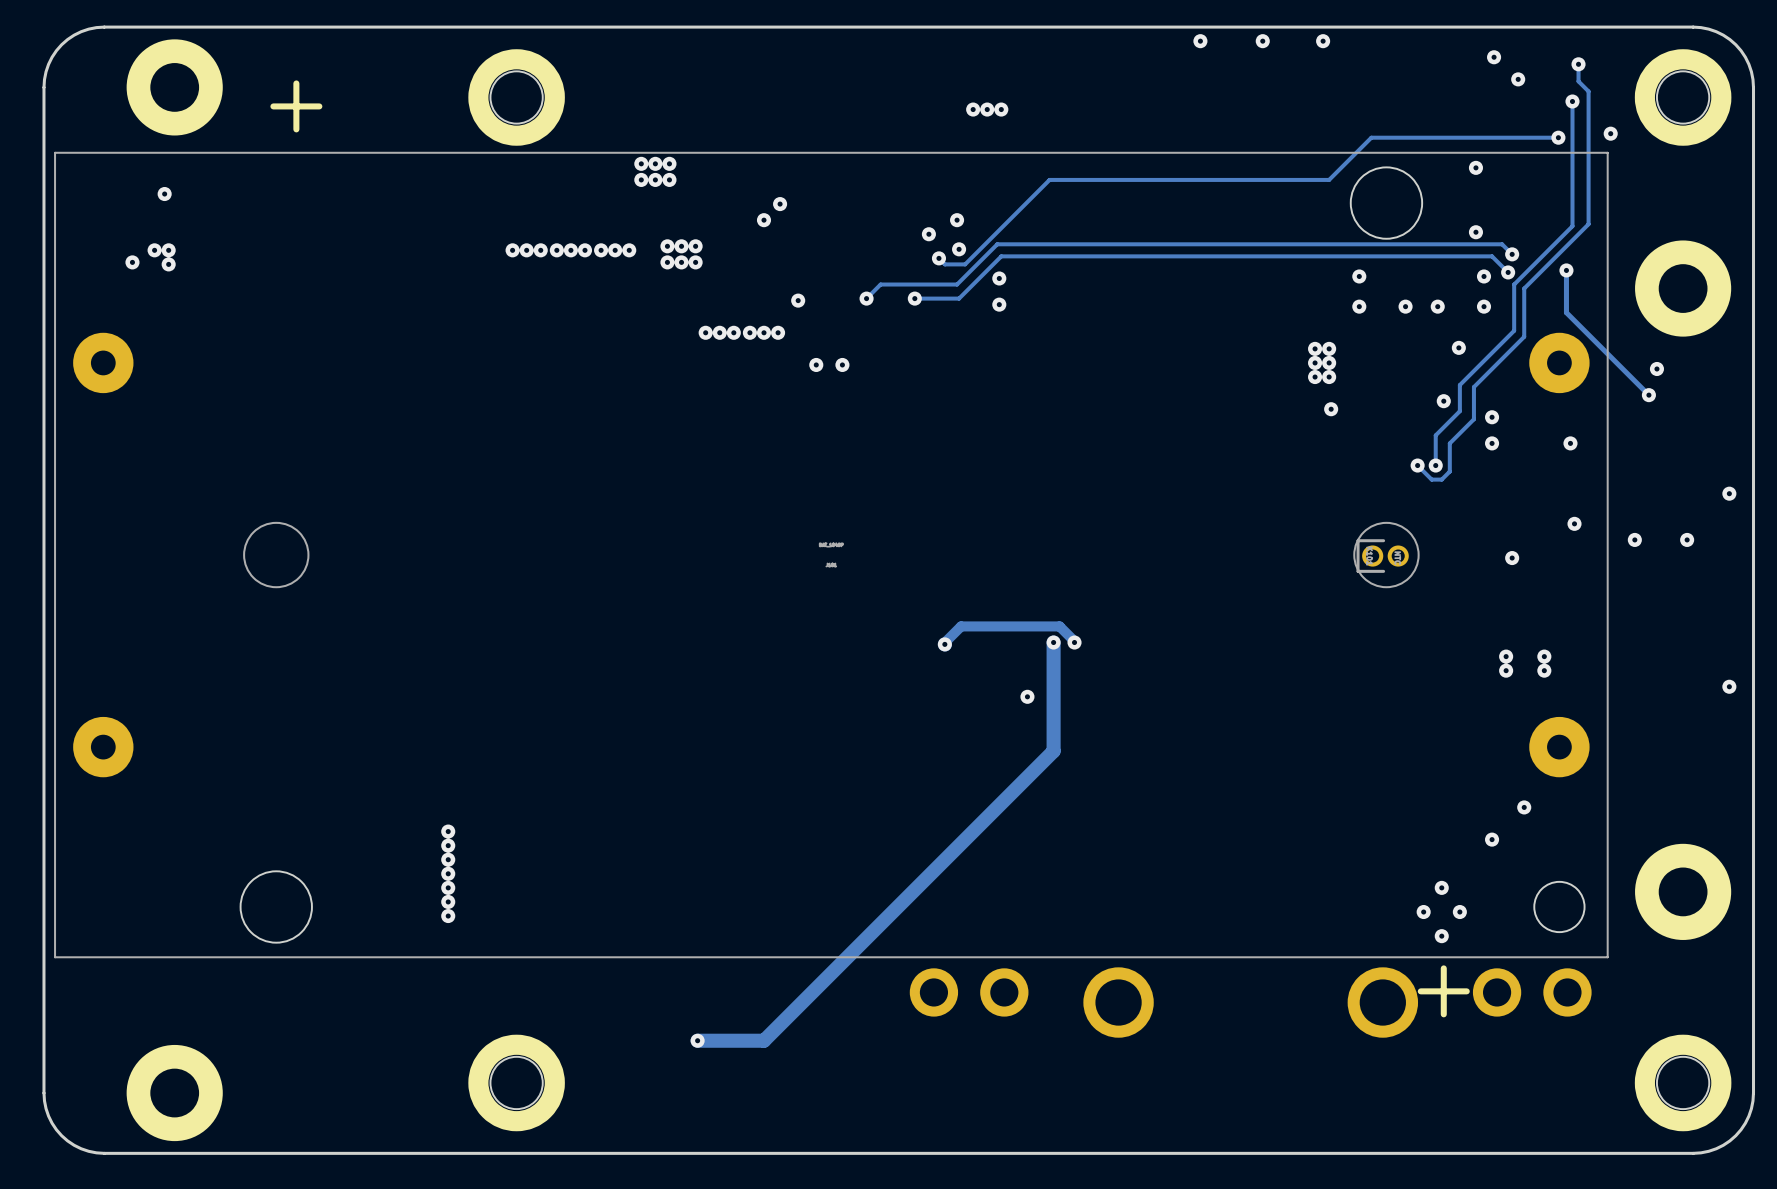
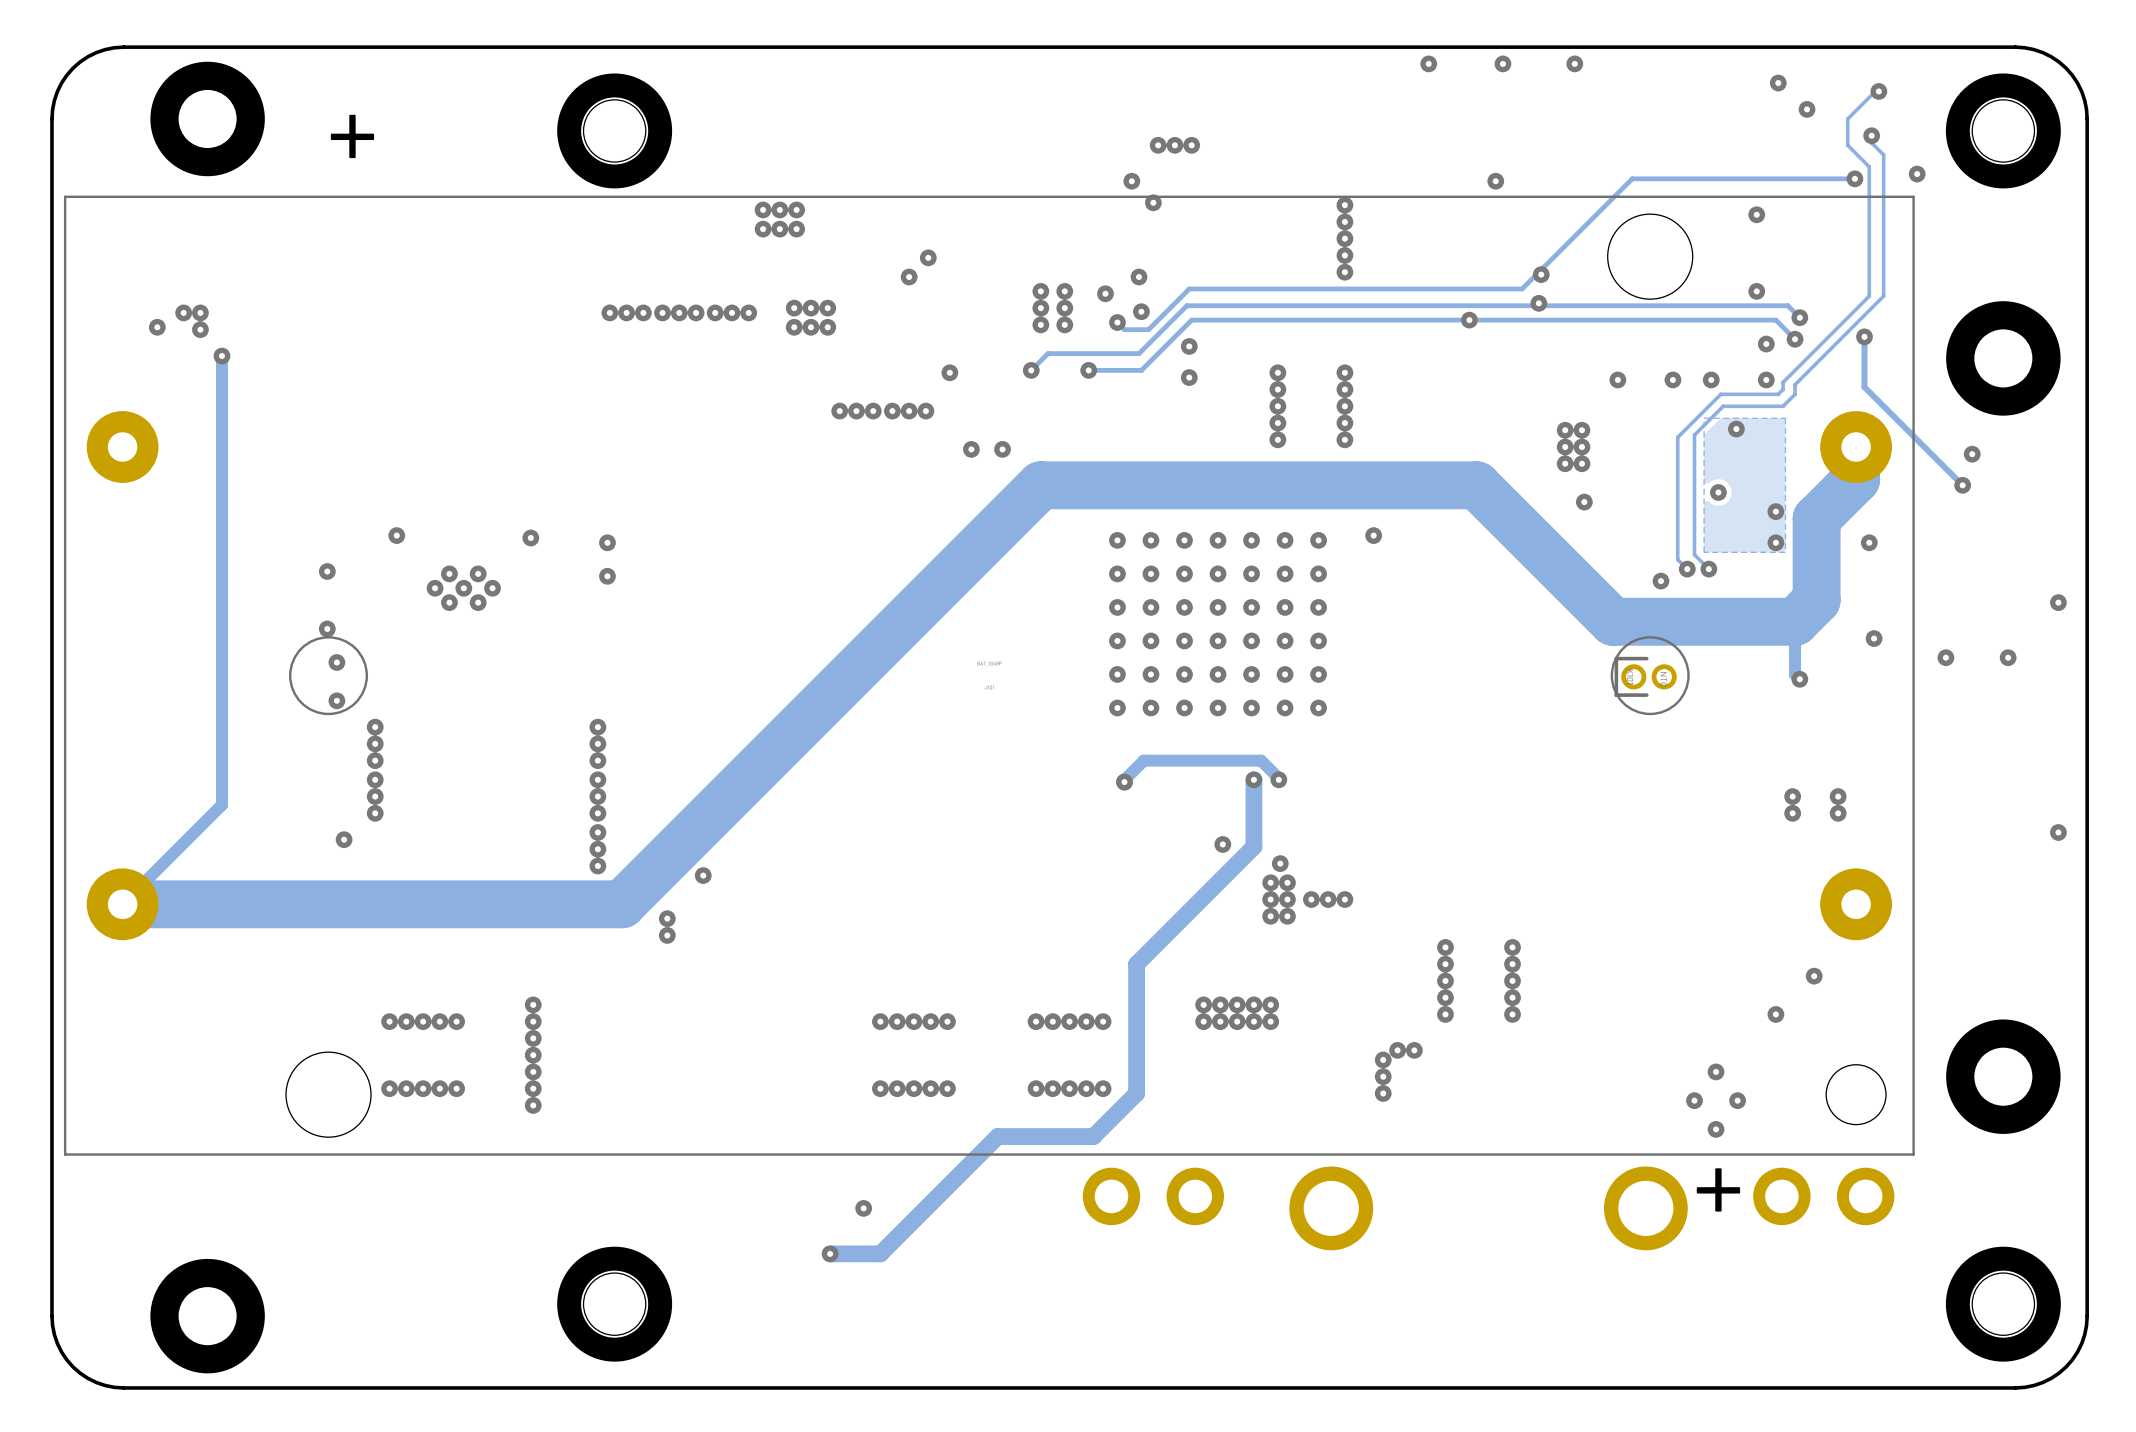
track: (1578, 64) (1578, 81) (1588, 91) (1588, 224) (1524, 288) (1524, 336) (1473, 387) (1473, 419) (1449, 443) (1449, 471) (1441, 479) (1431, 479) (1417, 465) -> (1878, 91) (1875, 91) (1847, 118) (1847, 145) (1869, 166) (1869, 296) (1783, 382) (1783, 389) (1778, 394) (1720, 394) (1677, 437) (1677, 559) (1687, 569)
track: (1572, 107) (1572, 226) (1514, 284) (1514, 330) (1459, 385) (1459, 411) (1435, 435) (1435, 465) -> (1871, 142) (1883, 154) (1883, 296) (1795, 384) (1795, 394) (1783, 406) (1723, 406) (1694, 435) (1694, 554) (1708, 569)
via: none -> (1131, 181)
via: none -> (1495, 181)
via: none -> (1153, 202)
via: none -> (1344, 205)
via: none -> (1344, 221)
track: (1329, 179) (1049, 179) (999, 230) -> (1581, 229) (1522, 288) (1189, 288)
via: none -> (1344, 238)
via position: (164, 194) -> (221, 356)
via: none -> (1344, 255)
via: none -> (1344, 272)
via: none -> (1541, 274)
via: none -> (1040, 291)
via: none -> (1064, 291)
via: none -> (1538, 303)
via: none -> (1040, 308)
via: none -> (1064, 308)
via: none -> (1469, 320)
via: none -> (1040, 324)
via: none -> (1064, 324)
via: (1359, 276) -> none
track: none -> (221, 356) (221, 804) (122, 904) (621, 904) (1040, 485) (1476, 485) (1613, 621) (1795, 621)
via: none -> (1277, 372)
via: none -> (1344, 372)
via: none -> (1277, 389)
via: none -> (1344, 389)
via: none -> (1277, 406)
via: none -> (1344, 406)
zone outline: none -> (1785, 418) (1785, 552) (1704, 552) (1704, 418) (1785, 418)
via: none -> (1277, 423)
via: none -> (1344, 423)
via: none -> (1277, 439)
via: none -> (1344, 439)
track: none -> (1856, 447) (1856, 479) (1816, 518) (1816, 600) (1795, 621)
via: none -> (396, 535)
via: none -> (1373, 535)
via: none -> (530, 537)
via: none -> (1117, 540)
via: none -> (1150, 540)
via: none -> (1184, 540)
via: none -> (1218, 540)
via: none -> (1251, 540)
via: none -> (1285, 540)
via: none -> (1318, 540)
via: none -> (607, 542)
via: none -> (327, 571)
via: none -> (449, 573)
via: none -> (478, 573)
via: none -> (1117, 573)
via: none -> (1150, 573)
via: none -> (1184, 573)
via: none -> (1218, 573)
via: none -> (1251, 573)
via: none -> (1285, 573)
via: none -> (1318, 573)
via: none -> (607, 576)
via: none -> (1660, 581)
via: none -> (435, 588)
via: none -> (463, 588)
via: none -> (492, 588)
via: none -> (449, 602)
via: none -> (478, 602)
via: none -> (1117, 607)
via: none -> (1150, 607)
via: none -> (1184, 607)
via: none -> (1218, 607)
via: none -> (1251, 607)
via: none -> (1285, 607)
via: none -> (1318, 607)
track: none -> (1795, 621) (1795, 674) (1799, 679)
via: none -> (327, 628)
via: none -> (1117, 640)
via: none -> (1150, 640)
via: none -> (1184, 640)
via: none -> (1218, 640)
via: none -> (1251, 640)
via: none -> (1285, 640)
via: none -> (1318, 640)
via: none -> (336, 662)
via: none -> (1117, 674)
via: none -> (1150, 674)
via: none -> (1184, 674)
via: none -> (1218, 674)
via: none -> (1251, 674)
via: none -> (1285, 674)
via: none -> (1318, 674)
via: none -> (336, 700)
via: none -> (1117, 707)
via: none -> (1150, 707)
via: none -> (1184, 707)
via: none -> (1218, 707)
via: none -> (1251, 707)
via: none -> (1285, 707)
via: none -> (1318, 707)
via: none -> (375, 727)
via: none -> (597, 727)
via: none -> (375, 743)
via: none -> (597, 743)
via: none -> (375, 760)
via: none -> (597, 760)
via: none -> (375, 779)
via: none -> (597, 779)
via: none -> (375, 796)
via: none -> (597, 796)
via: none -> (375, 813)
via: none -> (597, 813)
via: none -> (597, 832)
via: none -> (344, 839)
track: (1053, 698) (1053, 751) (763, 1040) (739, 1040) -> (1253, 846) (1136, 964) (1136, 1093) (1093, 1136) (997, 1136) (880, 1253)
via: none -> (597, 849)
via: none -> (1280, 863)
via: none -> (597, 866)
via: none -> (703, 875)
via: none -> (1270, 882)
via: none -> (1287, 882)
via: none -> (1270, 899)
via: none -> (1287, 899)
via: none -> (1311, 899)
via: none -> (1328, 899)
via: none -> (1344, 899)
via: none -> (1270, 916)
via: none -> (1287, 916)
via: none -> (667, 918)
via: none -> (667, 935)
via: none -> (1445, 947)
via: none -> (1512, 947)
via: none -> (1445, 964)
via: none -> (1512, 964)
via: none -> (1445, 980)
via: none -> (1512, 980)
via: none -> (1445, 997)
via: none -> (1512, 997)
via: none -> (1203, 1004)
via: none -> (1220, 1004)
via: none -> (1237, 1004)
via: none -> (1253, 1004)
via: none -> (1270, 1004)
via: none -> (1445, 1014)
via: none -> (1512, 1014)
via: none -> (389, 1021)
via: none -> (406, 1021)
via: none -> (423, 1021)
via: none -> (439, 1021)
via: none -> (456, 1021)
via: none -> (880, 1021)
via: none -> (897, 1021)
via: none -> (913, 1021)
via: none -> (930, 1021)
via: none -> (947, 1021)
via: none -> (1036, 1021)
via: none -> (1052, 1021)
via: none -> (1069, 1021)
via: none -> (1086, 1021)
via: none -> (1103, 1021)
via: none -> (1203, 1021)
via: none -> (1220, 1021)
via: none -> (1237, 1021)
via: none -> (1253, 1021)
via: none -> (1270, 1021)
via: none -> (1397, 1050)
via: none -> (1414, 1050)
via: none -> (1383, 1059)
via: none -> (1383, 1076)
via: none -> (389, 1088)
via: none -> (406, 1088)
via: none -> (423, 1088)
via: none -> (439, 1088)
via: none -> (456, 1088)
via: none -> (880, 1088)
via: none -> (897, 1088)
via: none -> (913, 1088)
via: none -> (930, 1088)
via: none -> (947, 1088)
via: none -> (1036, 1088)
via: none -> (1052, 1088)
via: none -> (1069, 1088)
via: none -> (1086, 1088)
via: none -> (1103, 1088)
via: none -> (1383, 1093)
via: none -> (863, 1208)

